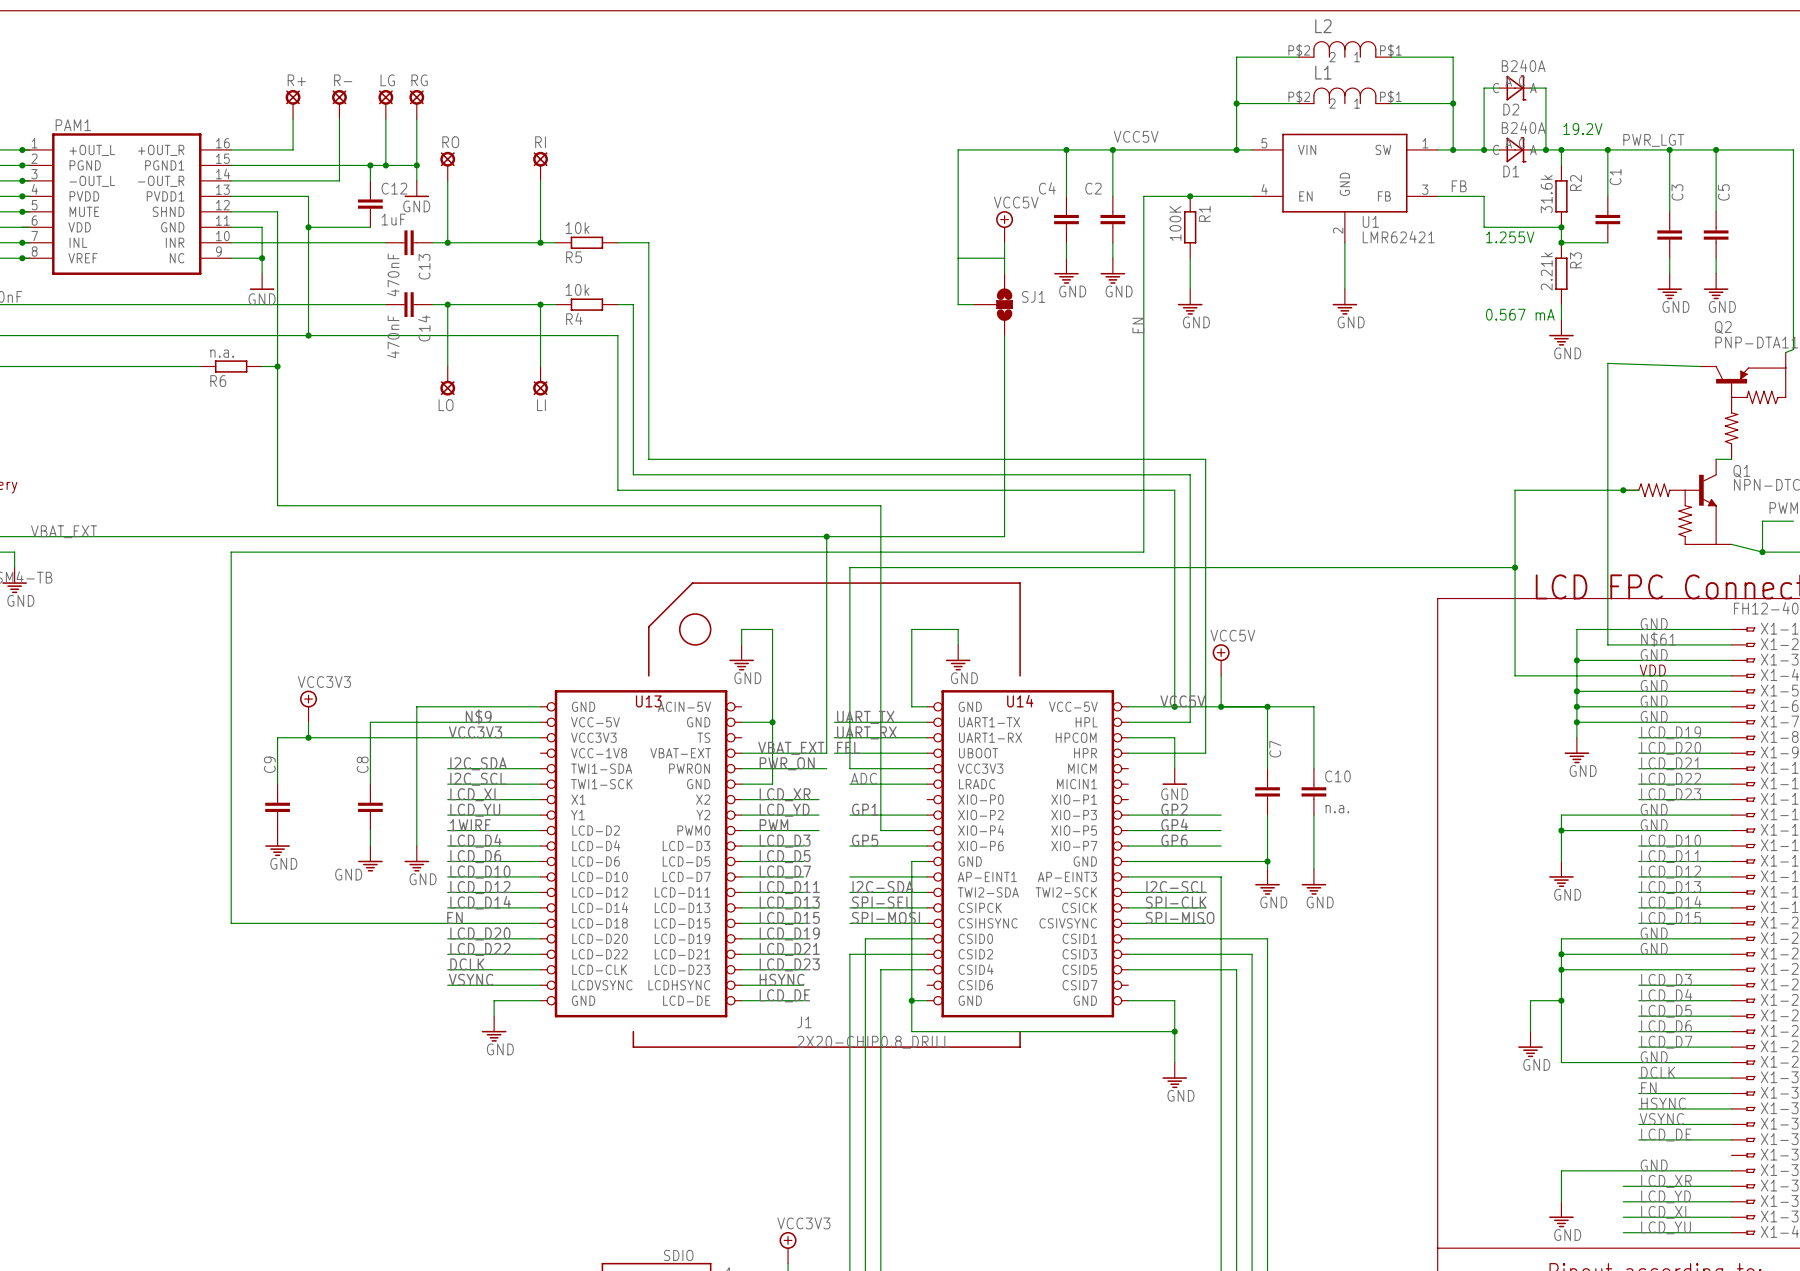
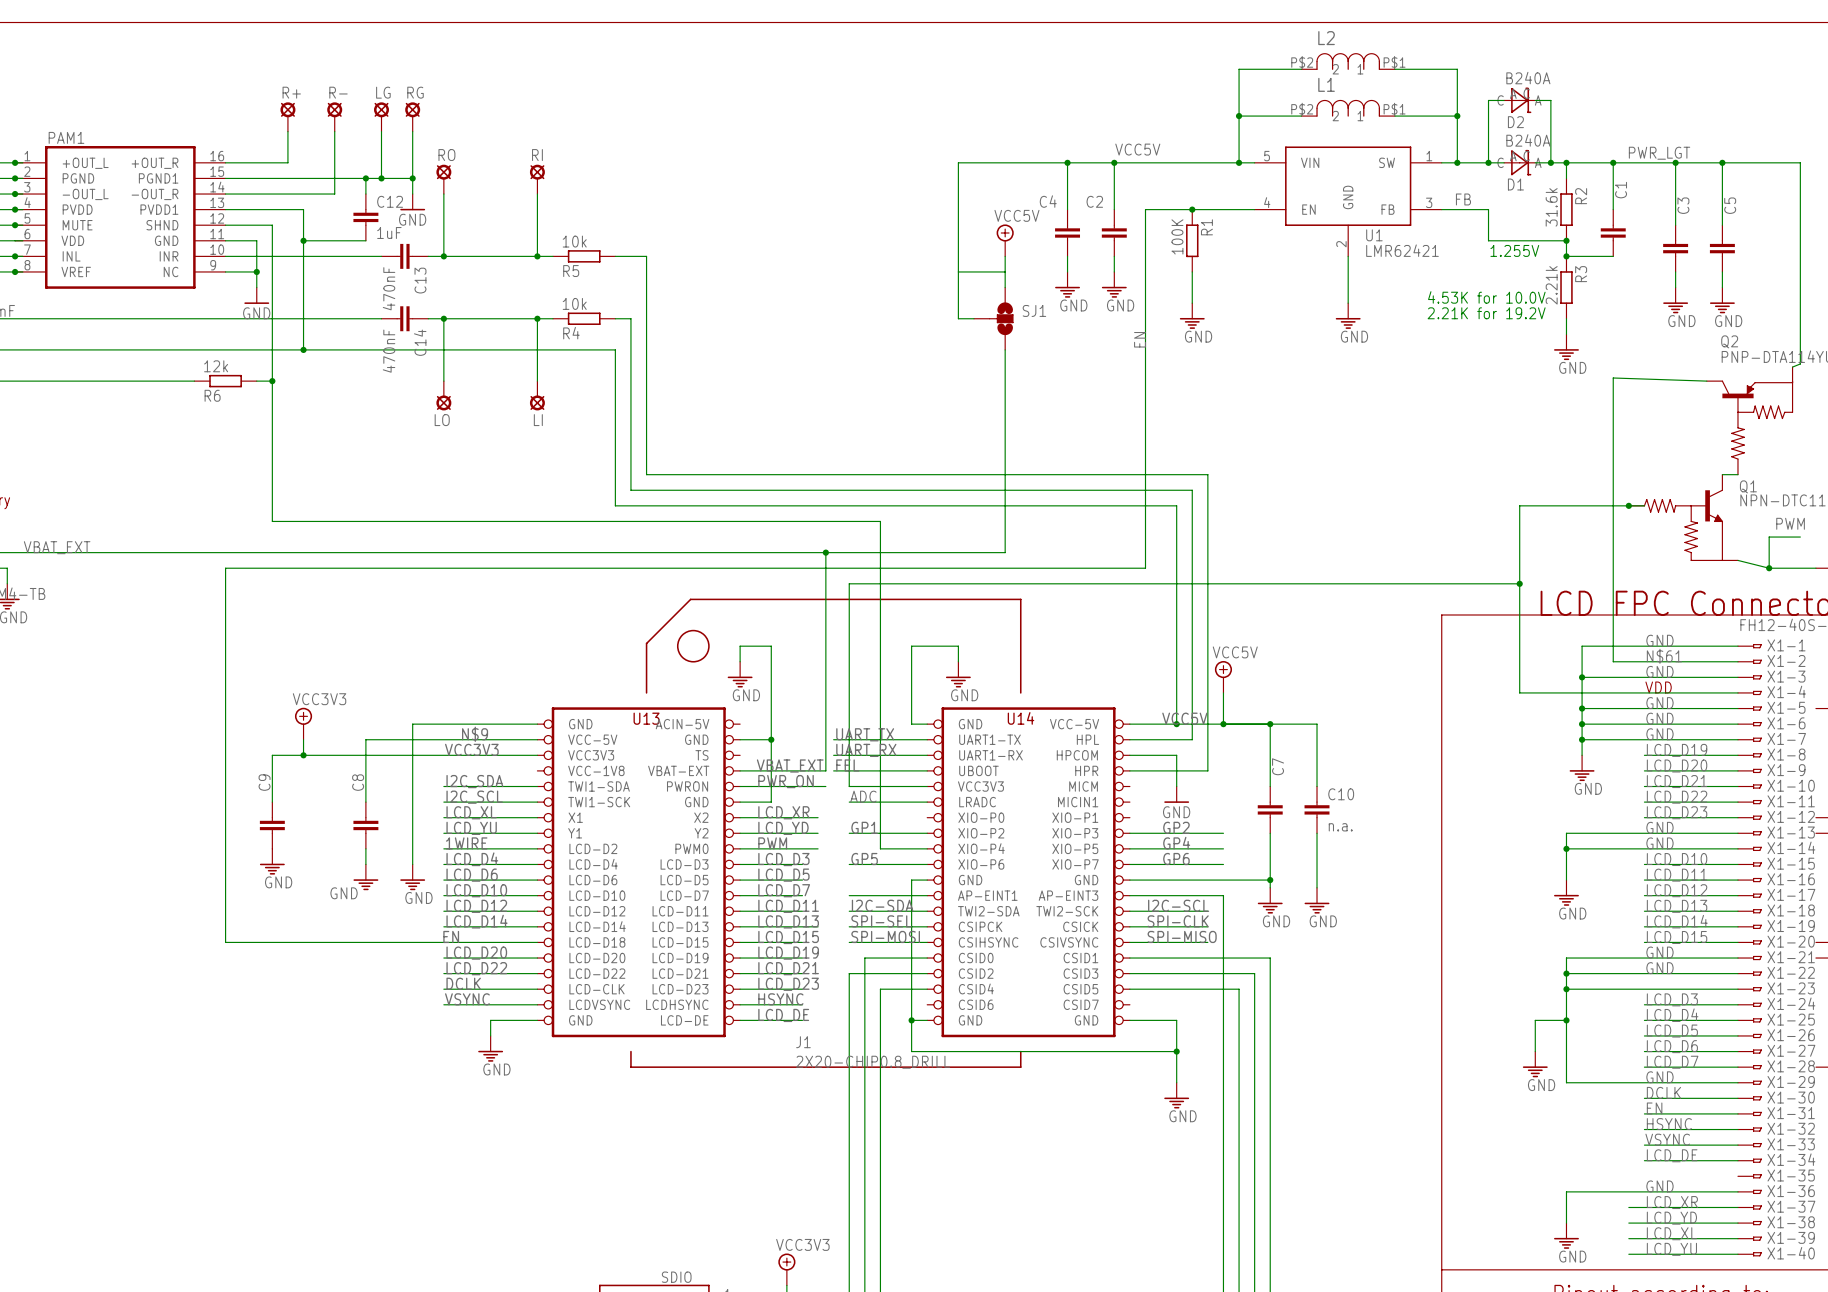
text: 19.2V (1582, 129) -> none
text: none -> 4.53K for 10.0V (1486, 297)
text: none -> 2.21K for 19.2V (1486, 313)
text: 0.567 mA (1520, 314) -> none
R6 value: n.a. (222, 353) -> 12k (216, 366)

